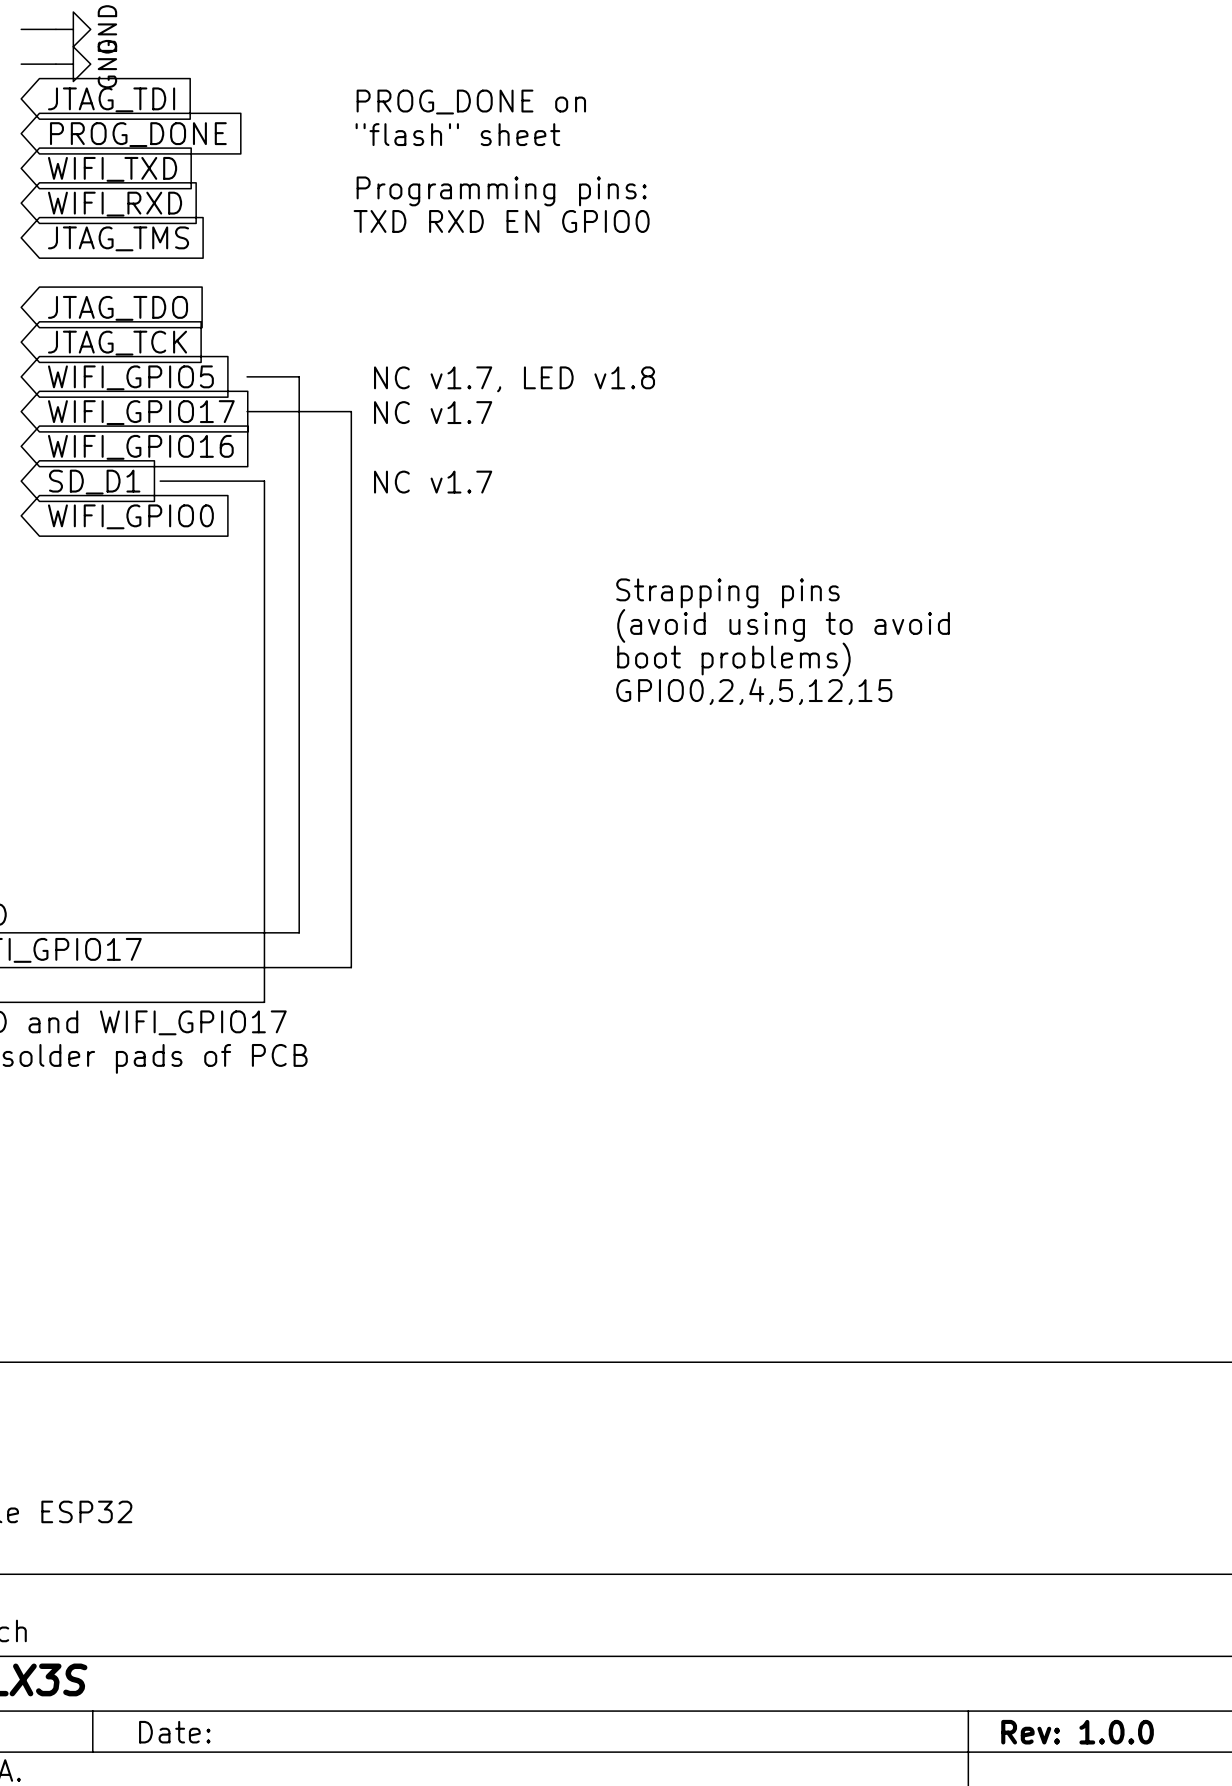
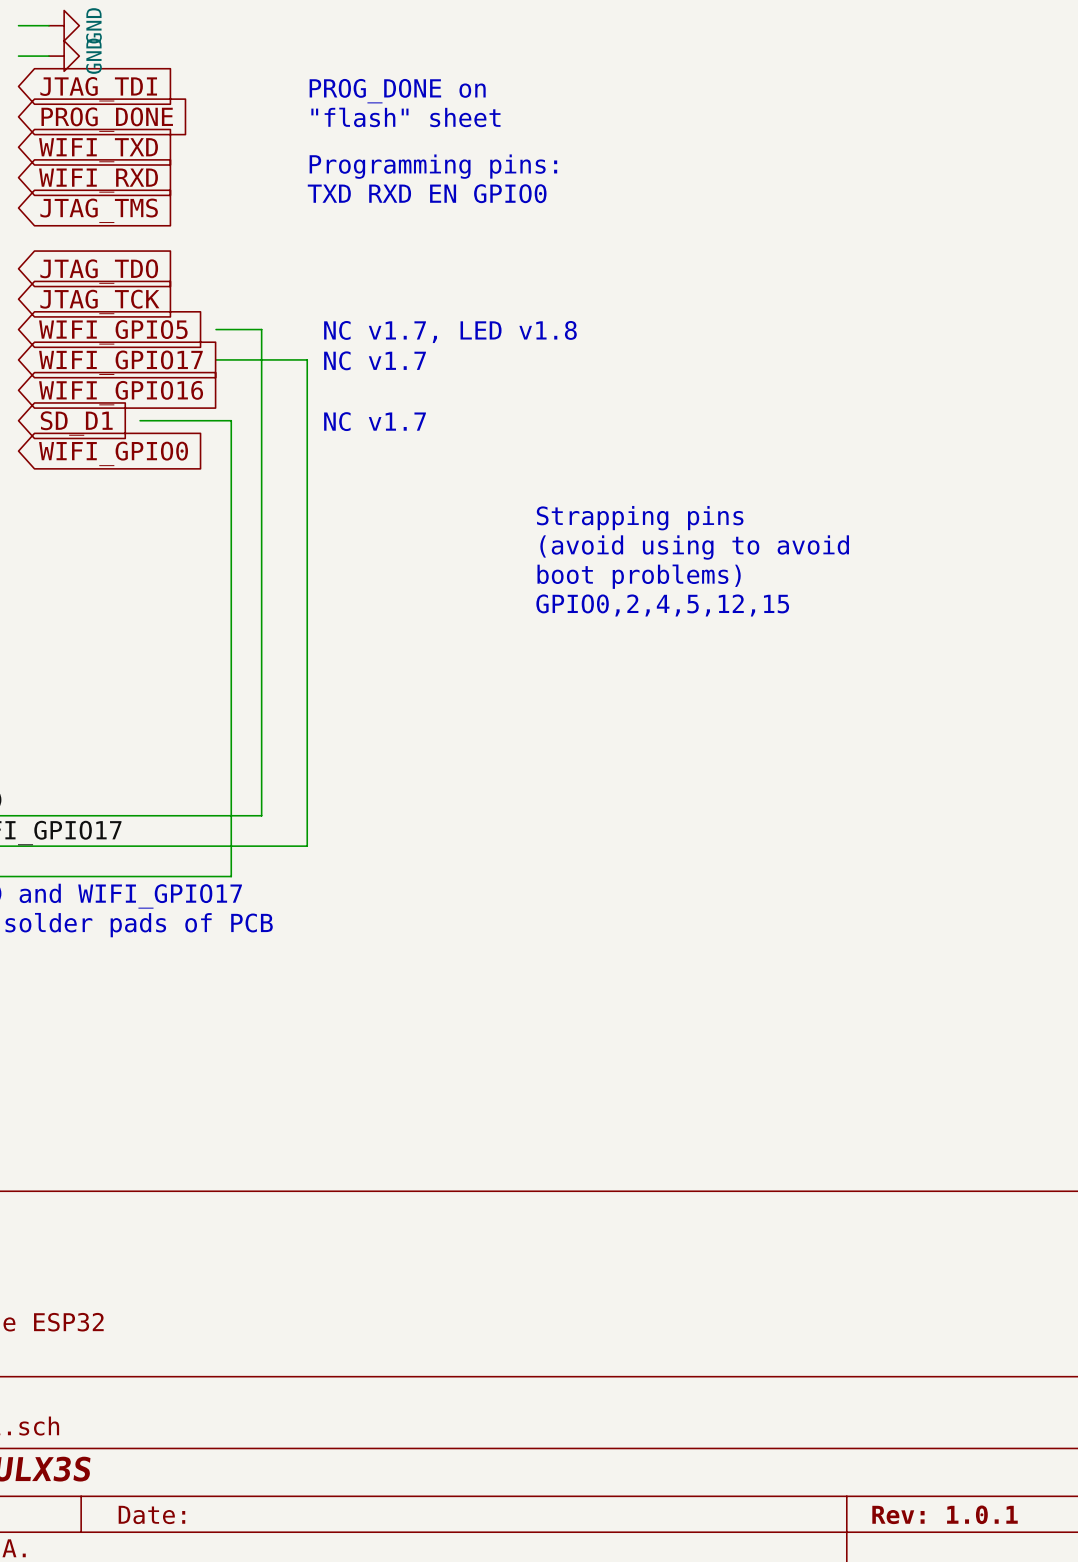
title block: Rev: 1.0.0 (1077, 1732) -> Rev: 1.0.1 (945, 1514)

